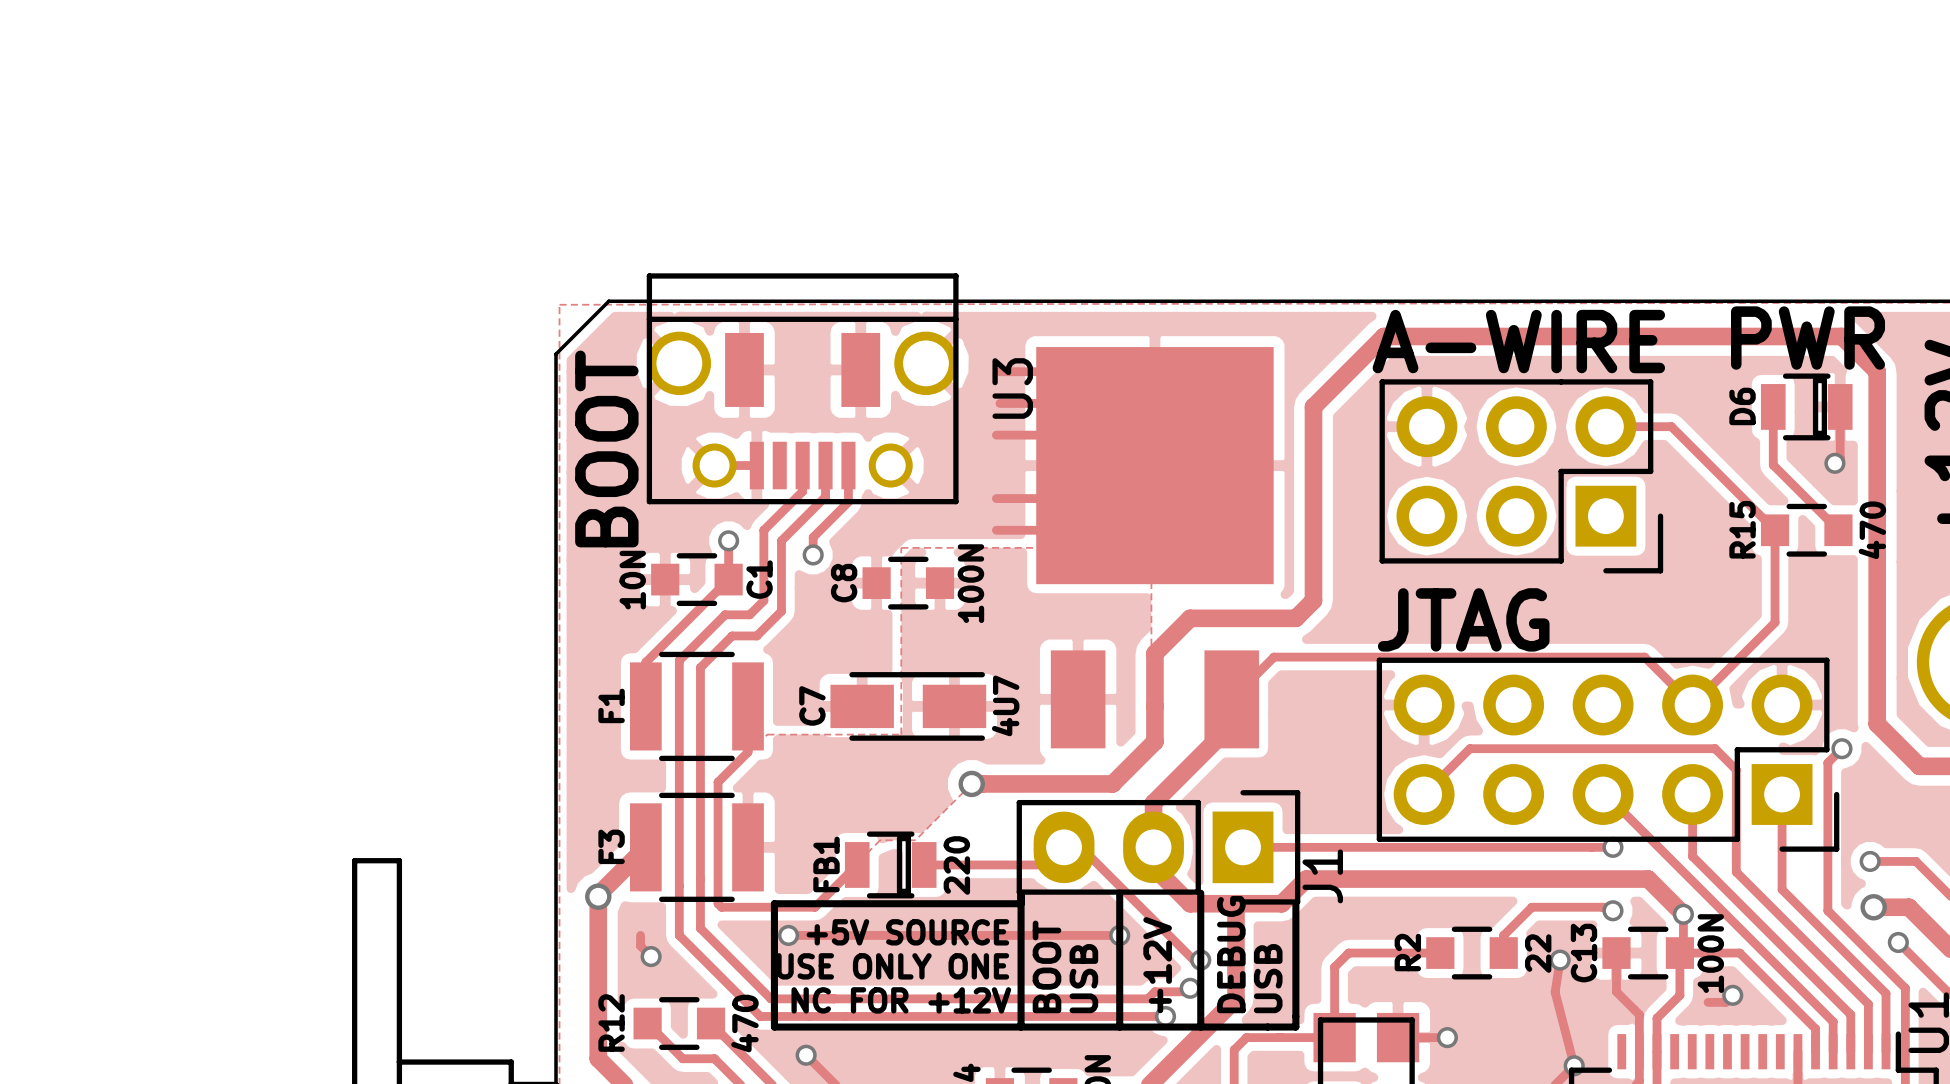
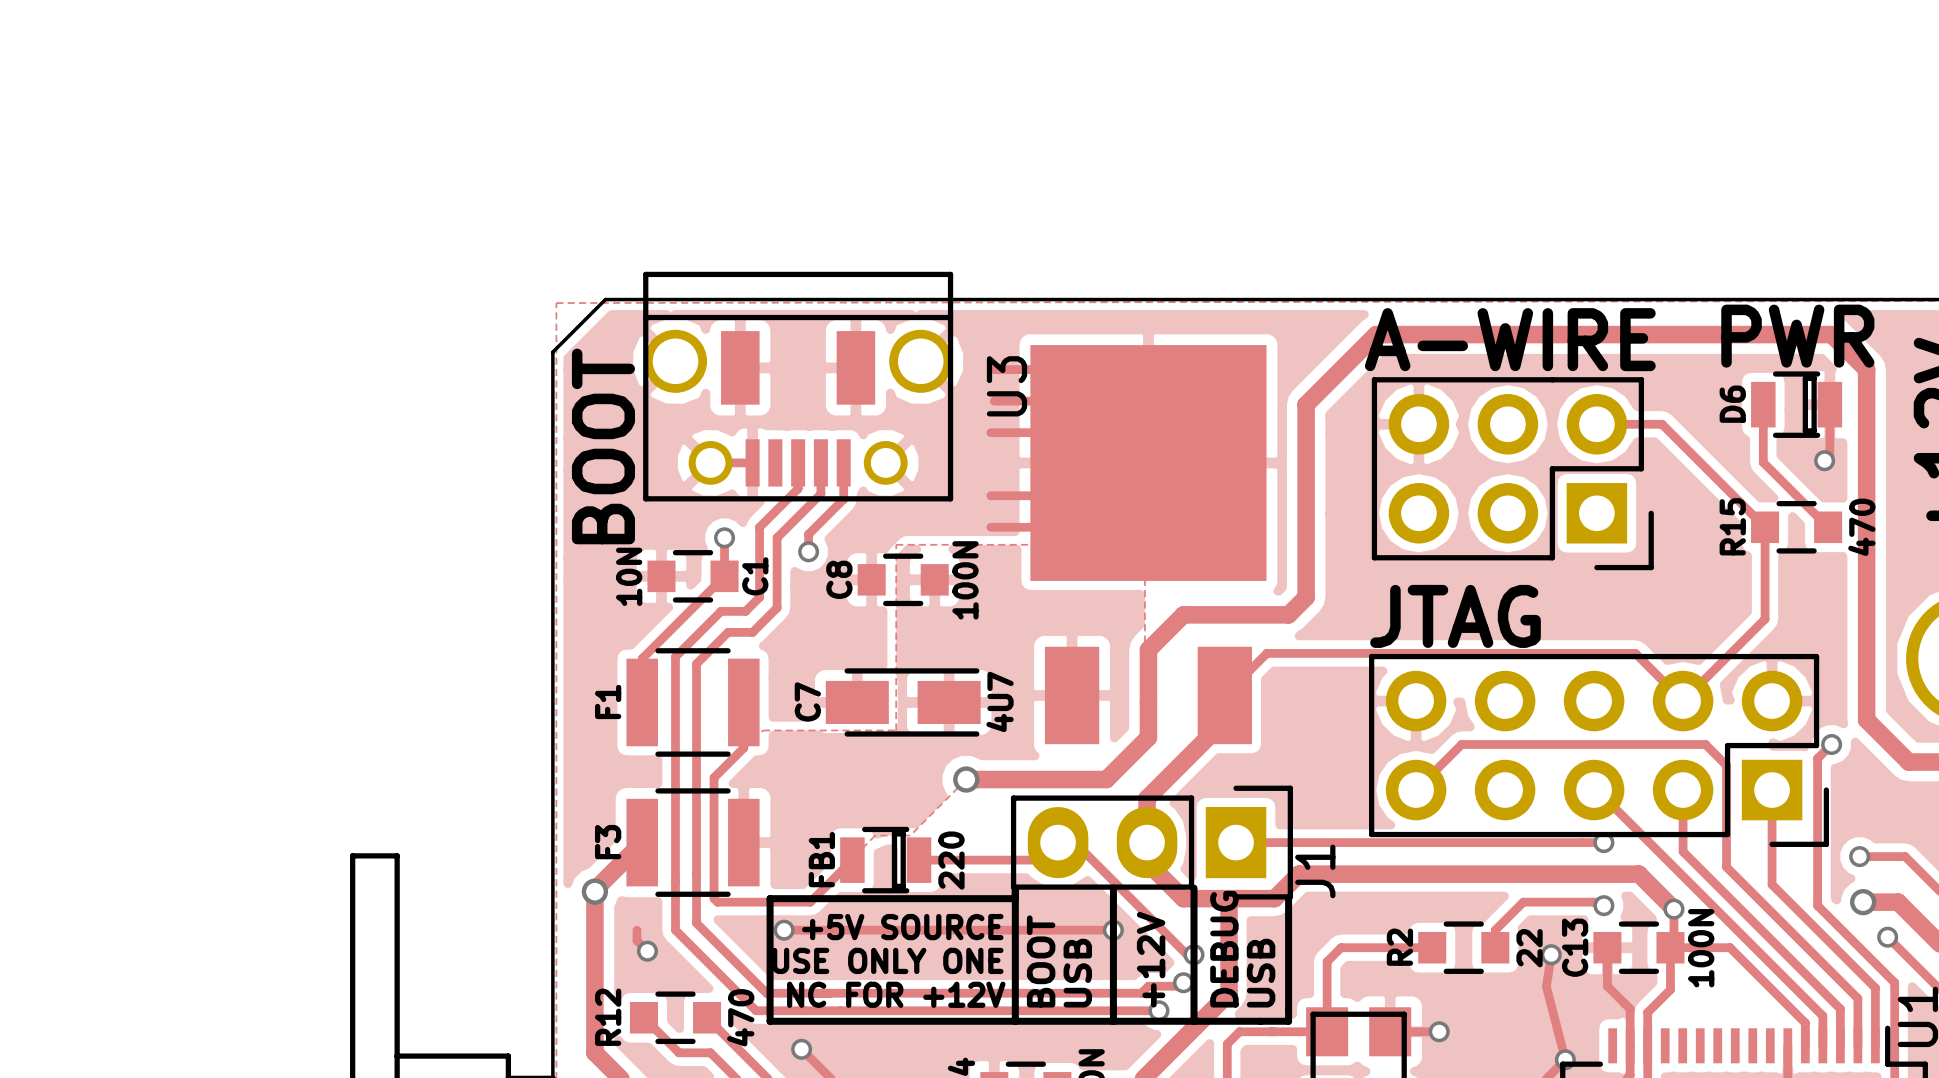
track: (1732, 995) (1725, 1002) (1708, 1002) -> none
via: (1732, 995) -> none

